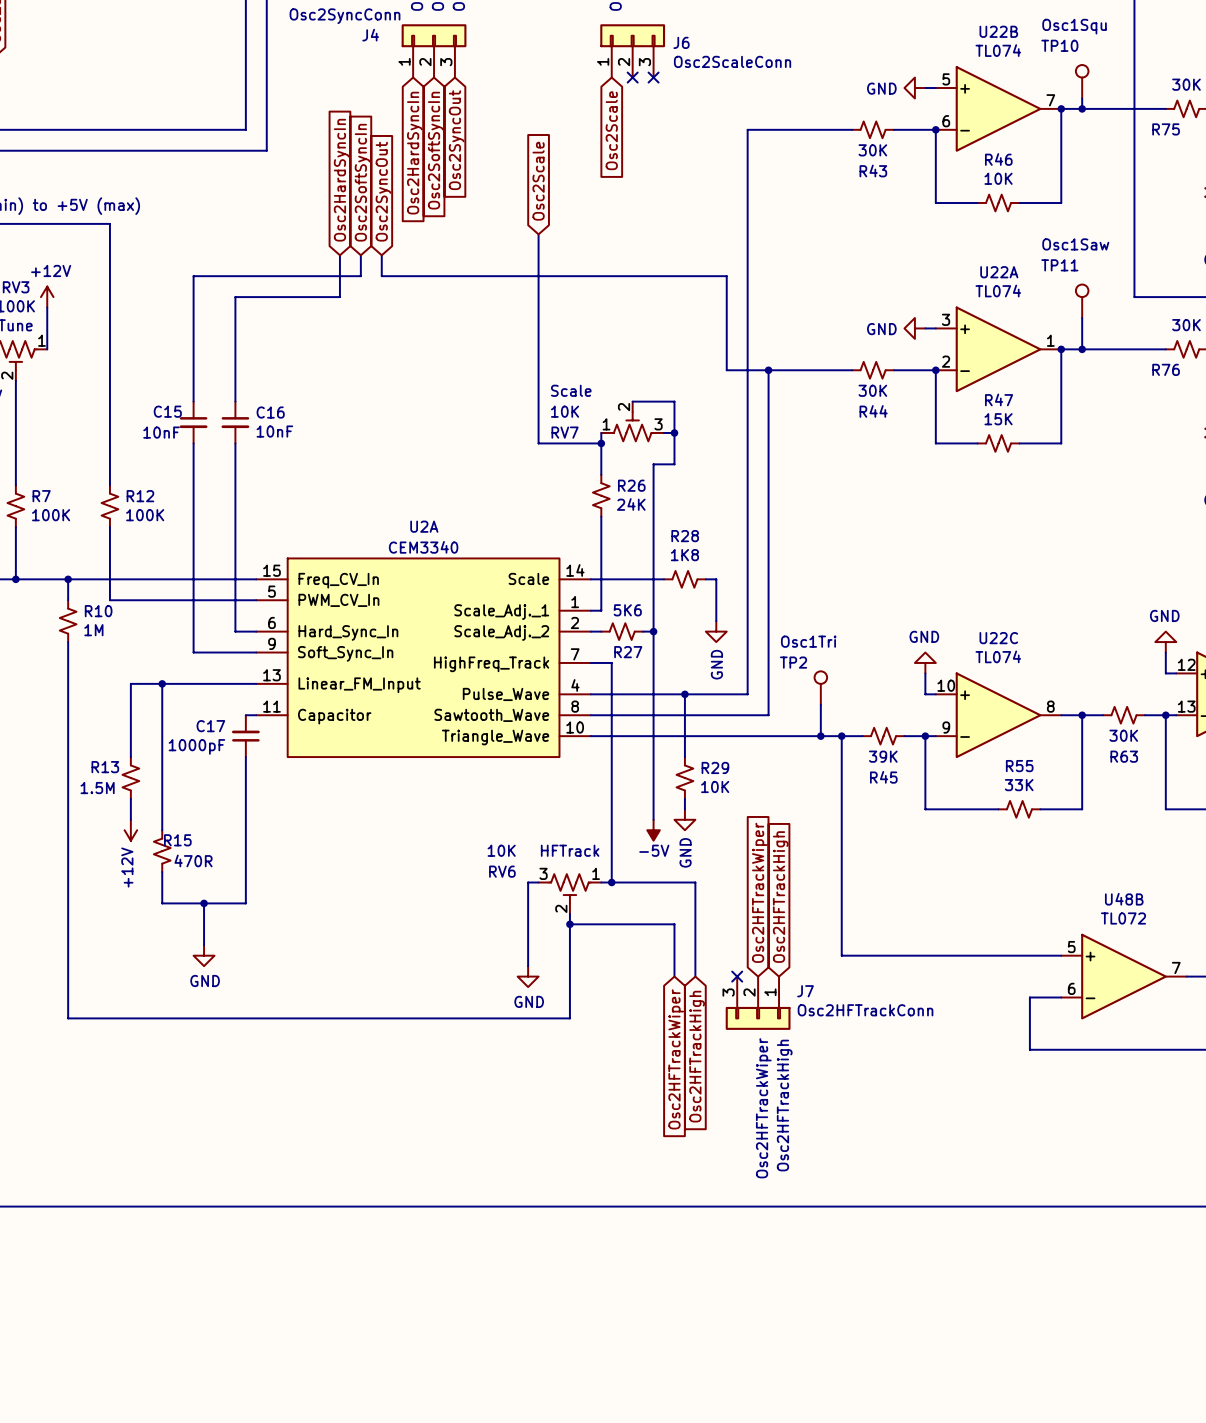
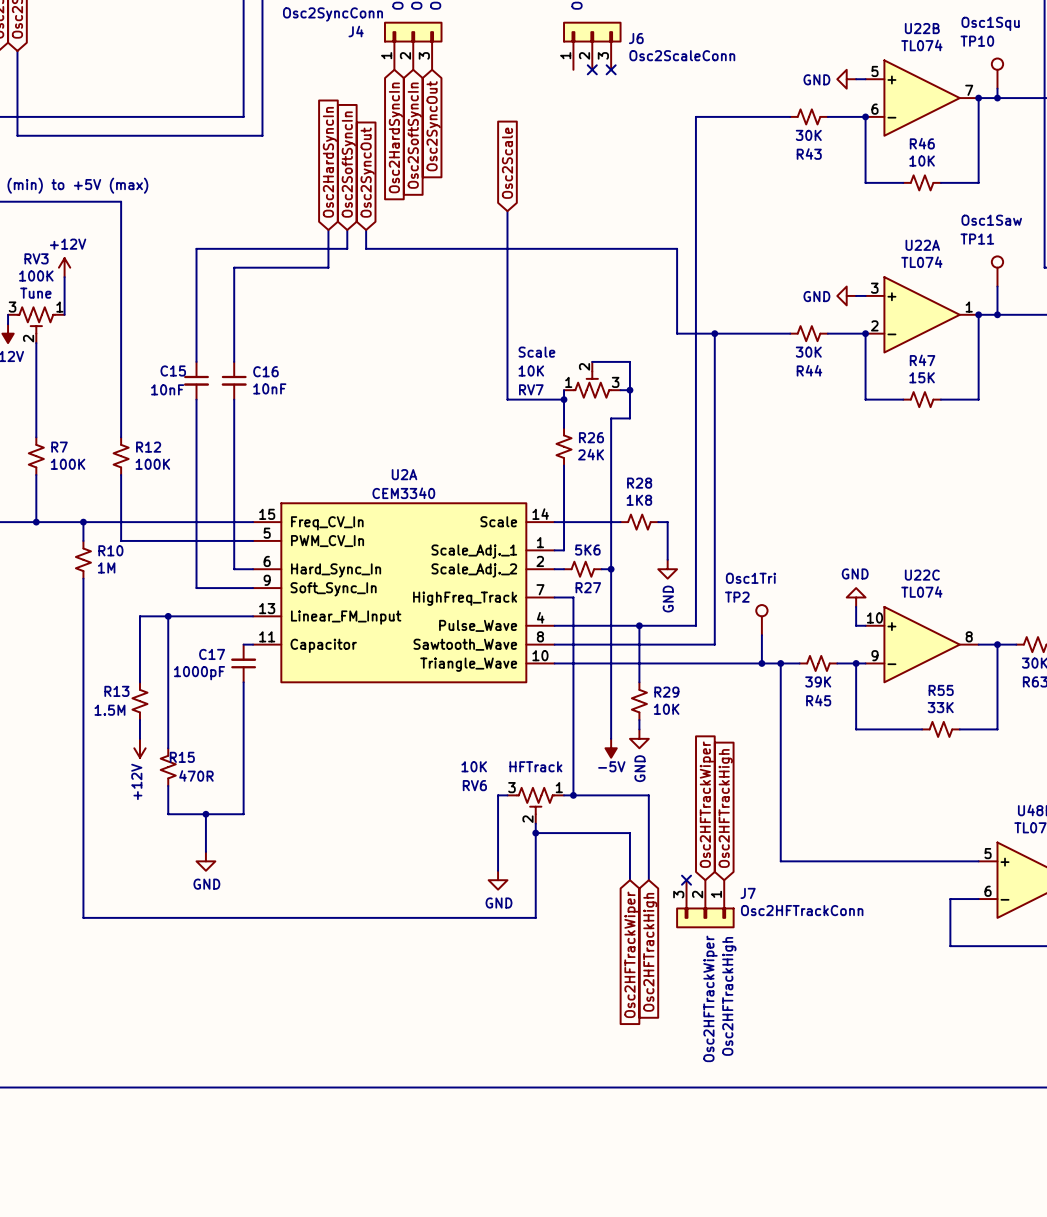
global label: Osc2Scale (611, 130) -> none

